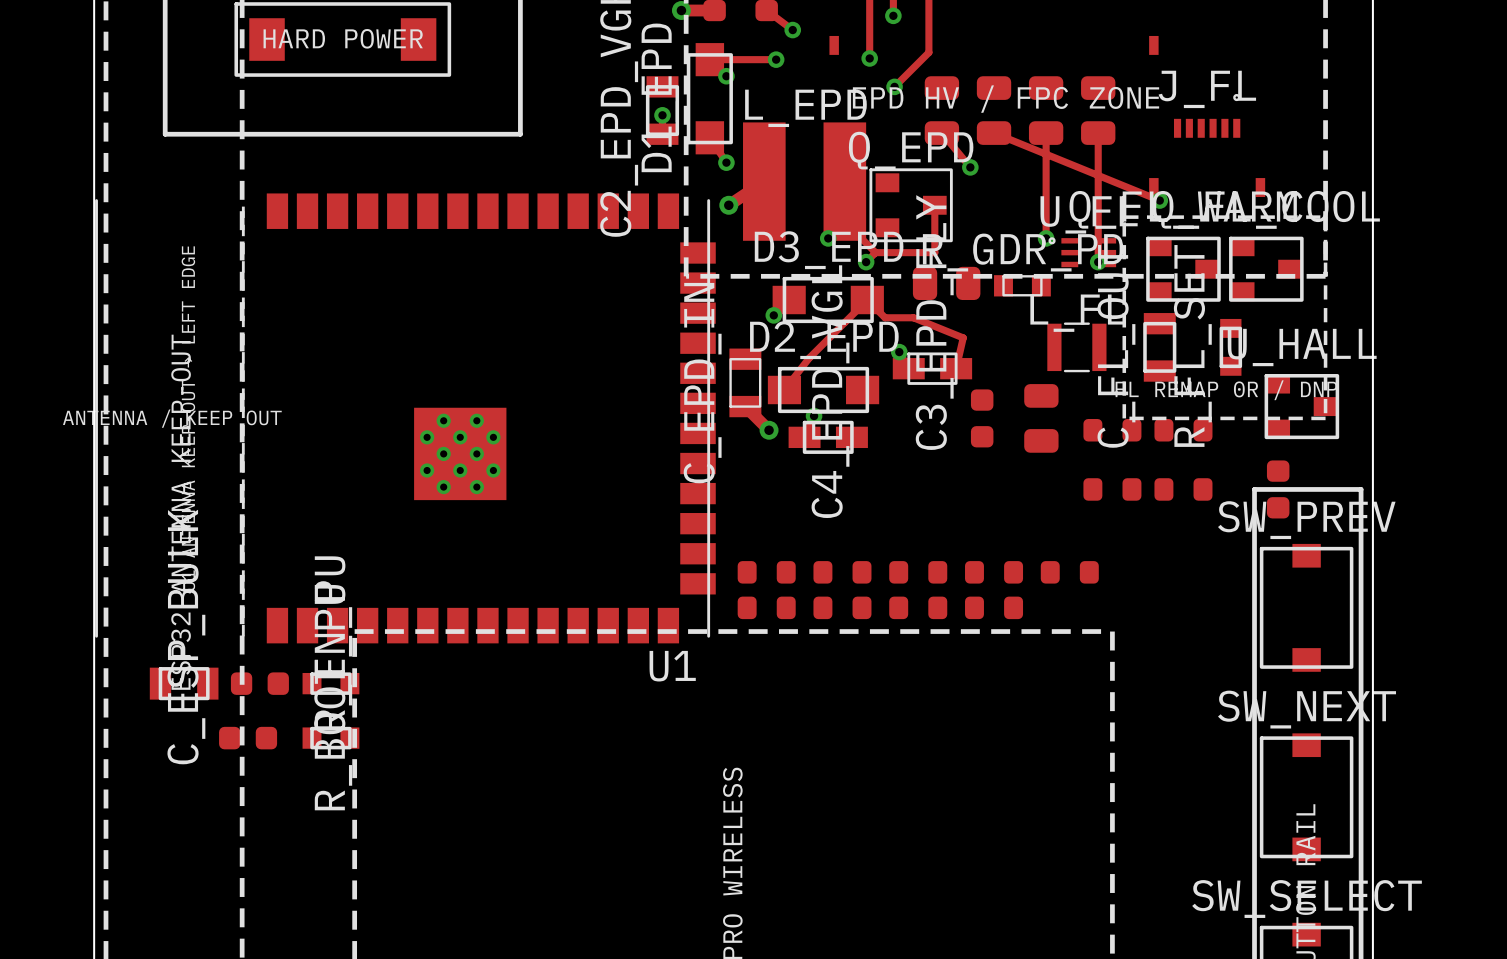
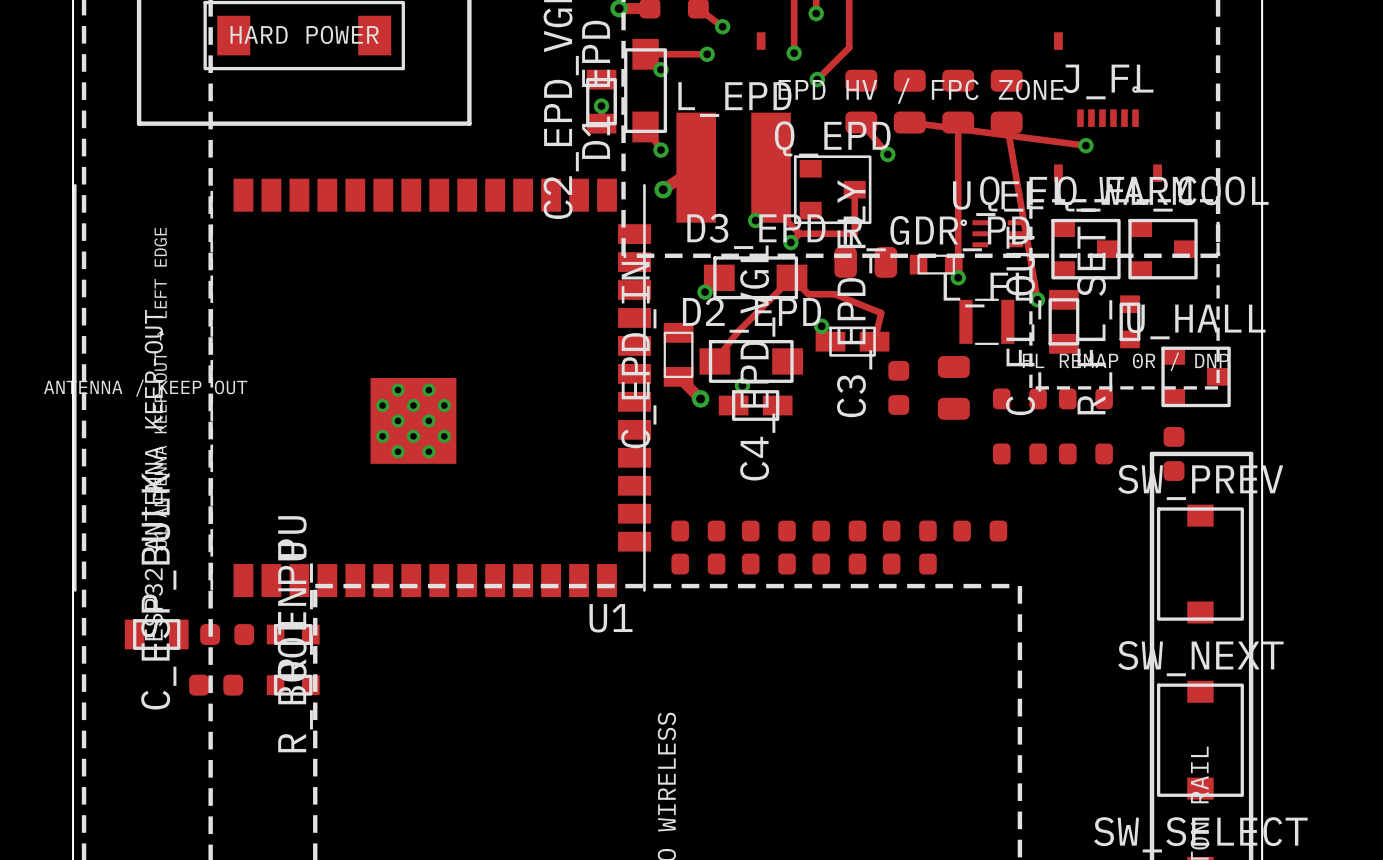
track: (994, 133) (1159, 200) -> (909, 122) (1085, 145)
track: (1098, 133) (1098, 262) -> (1006, 122) (1037, 299)
via position: (1159, 200) -> (1085, 145)
track: none -> (958, 220) (958, 277)
via: (1046, 238) -> none
via: (1098, 262) -> none
via: none -> (958, 277)
via: none -> (1037, 299)

